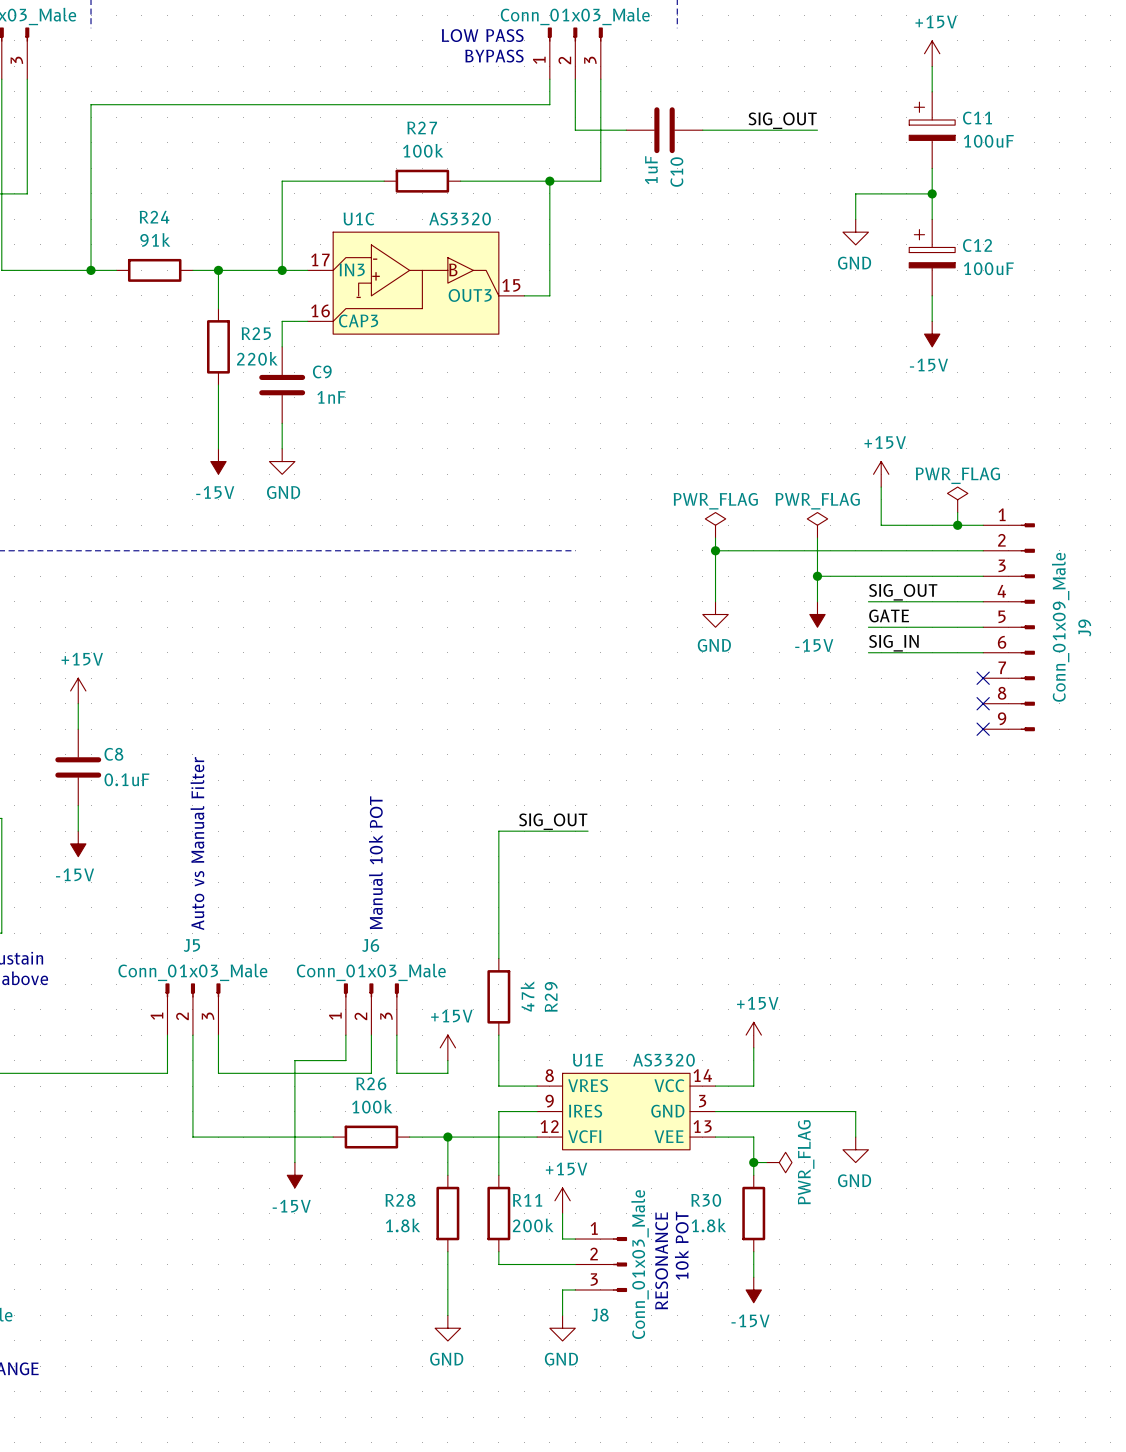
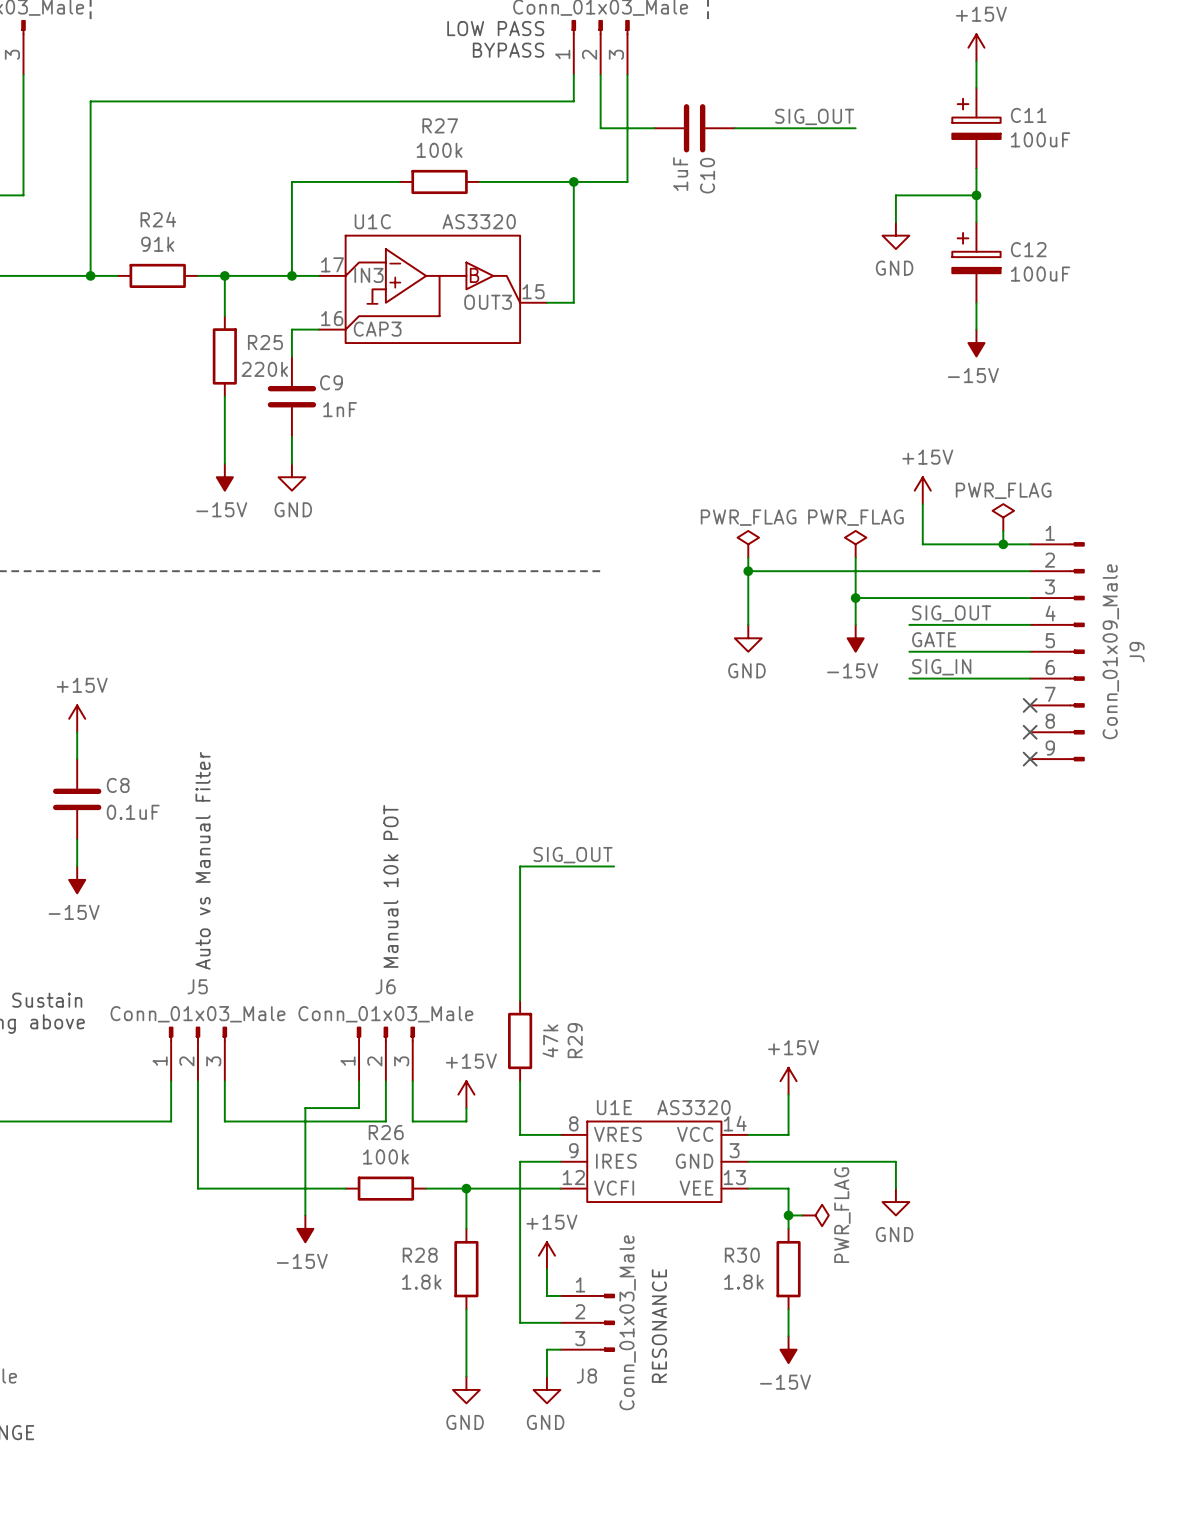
wire: none -> (520, 1228) (520, 1309)
power symbol position: +15V (562, 1200) -> +15V (546, 1255)
R11: 200k (498, 1213) -> none
wire: (562, 1213) (562, 1239) (575, 1239) -> (546, 1269) (546, 1295) (560, 1295)
text: 10k POT (681, 1245) -> none
text position: RESONANCE (661, 1260) -> RESONANCE (659, 1326)
J8 position: (601, 1264) -> (587, 1322)
wire: (575, 1289) (562, 1289) (562, 1315) -> (560, 1349) (546, 1349) (546, 1376)
power symbol position: GND (562, 1328) -> GND (546, 1389)

